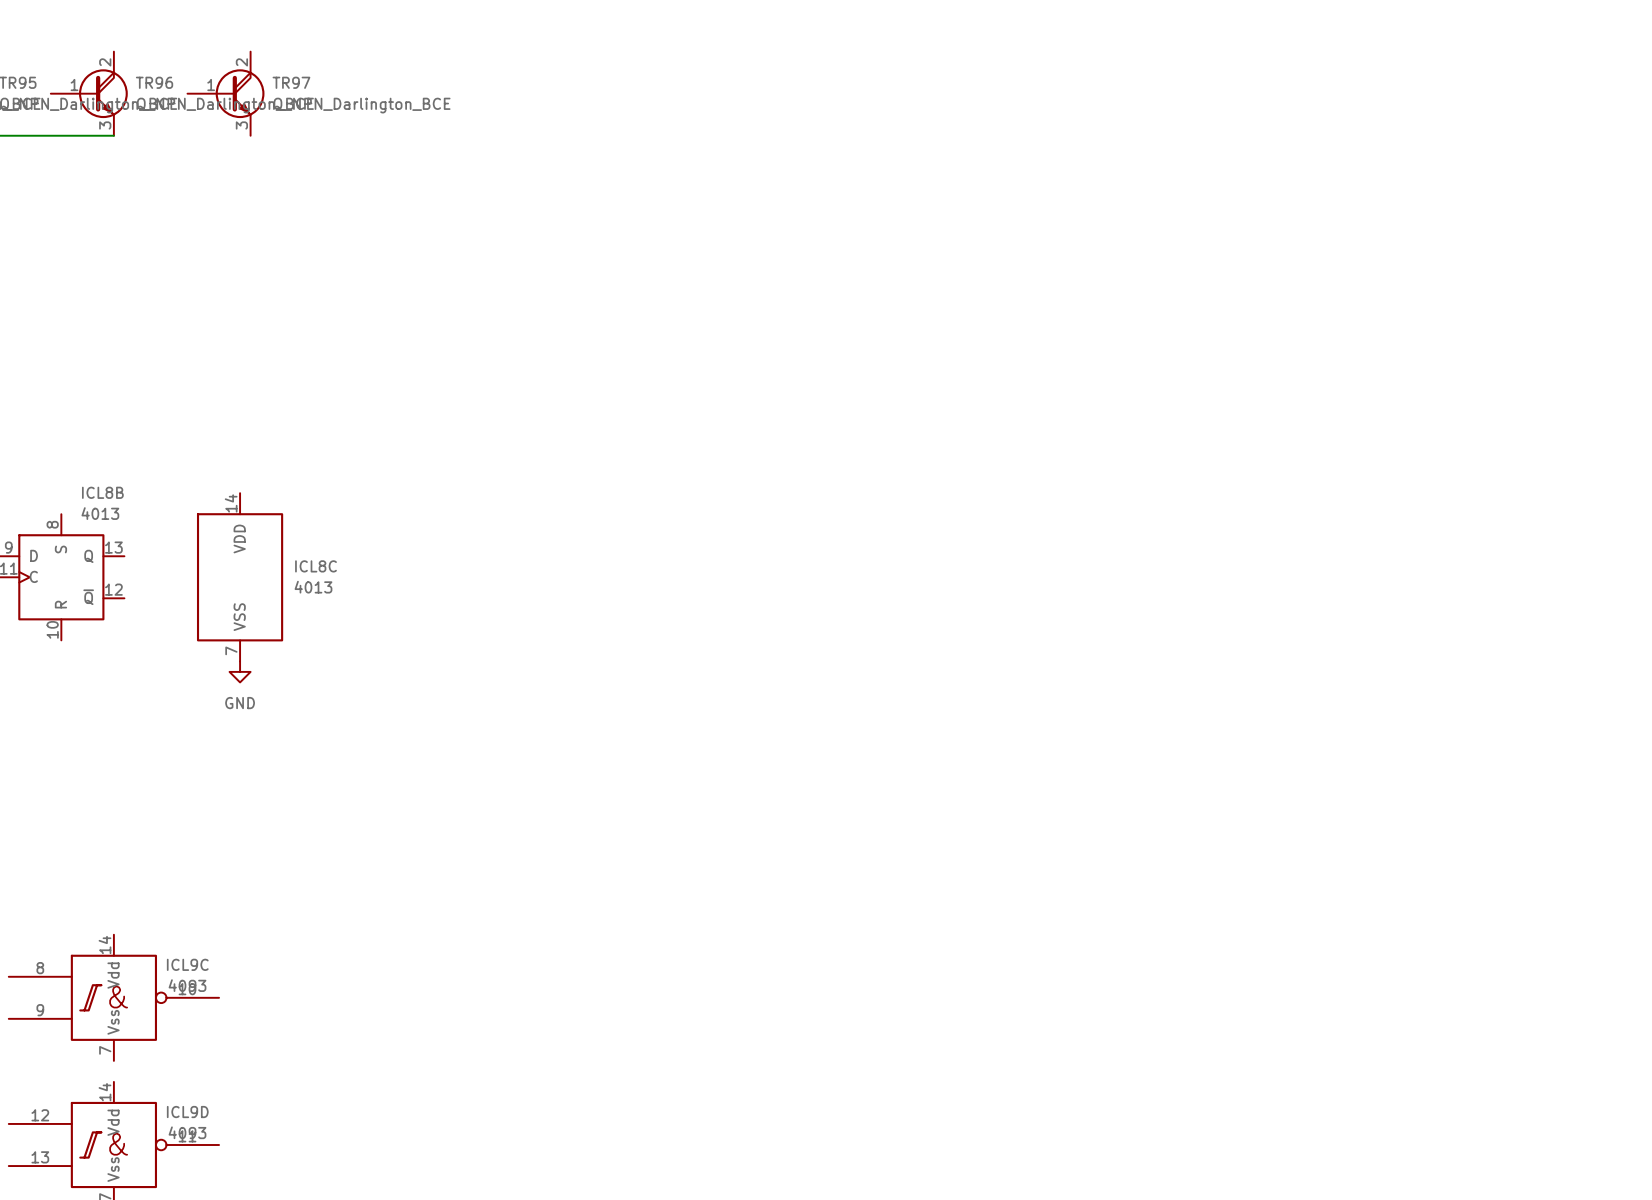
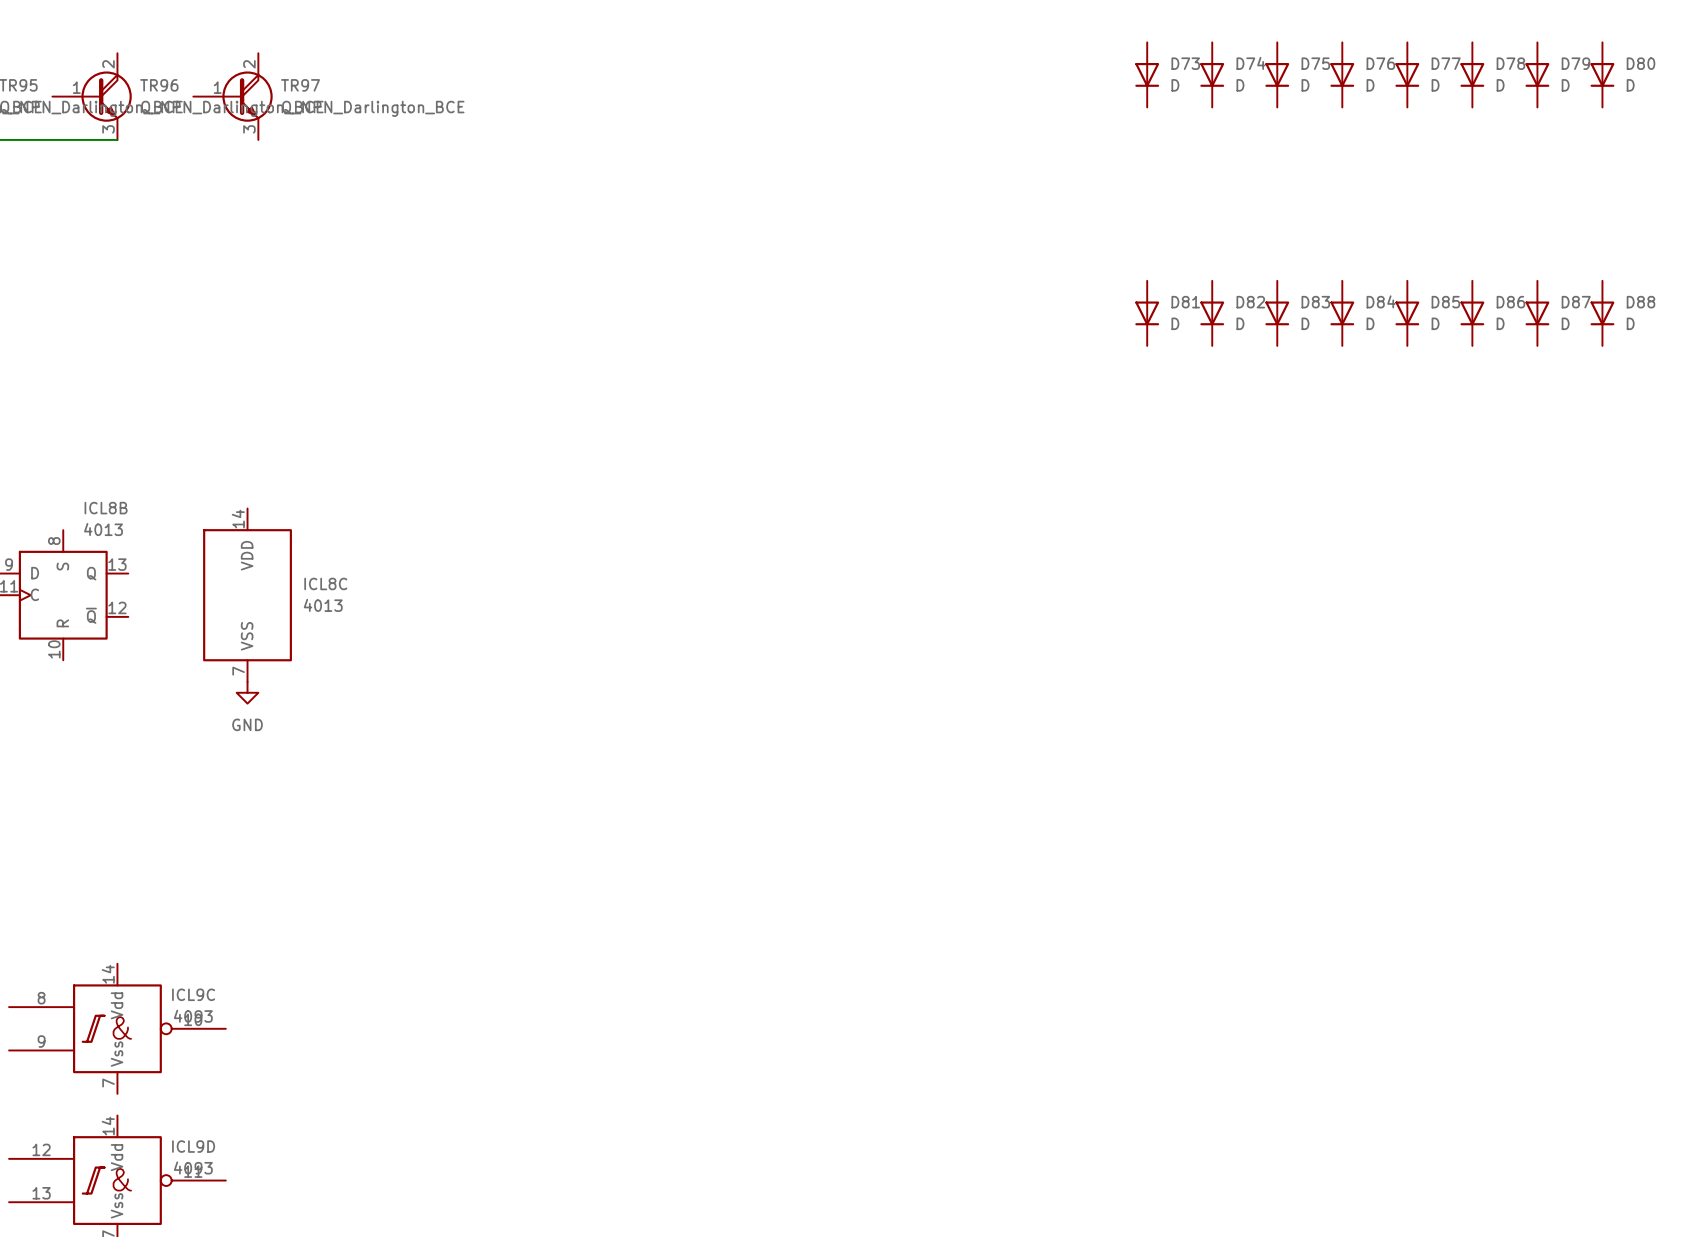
D73: none -> D (1147, 74)
D74: none -> D (1212, 74)
D75: none -> D (1277, 74)
D76: none -> D (1342, 74)
D77: none -> D (1407, 74)
D78: none -> D (1472, 74)
D79: none -> D (1537, 74)
D80: none -> D (1602, 74)
D81: none -> D (1147, 313)
D82: none -> D (1212, 313)
D83: none -> D (1277, 313)
D84: none -> D (1342, 313)
D85: none -> D (1407, 313)
D86: none -> D (1472, 313)
D87: none -> D (1537, 313)
D88: none -> D (1602, 313)

